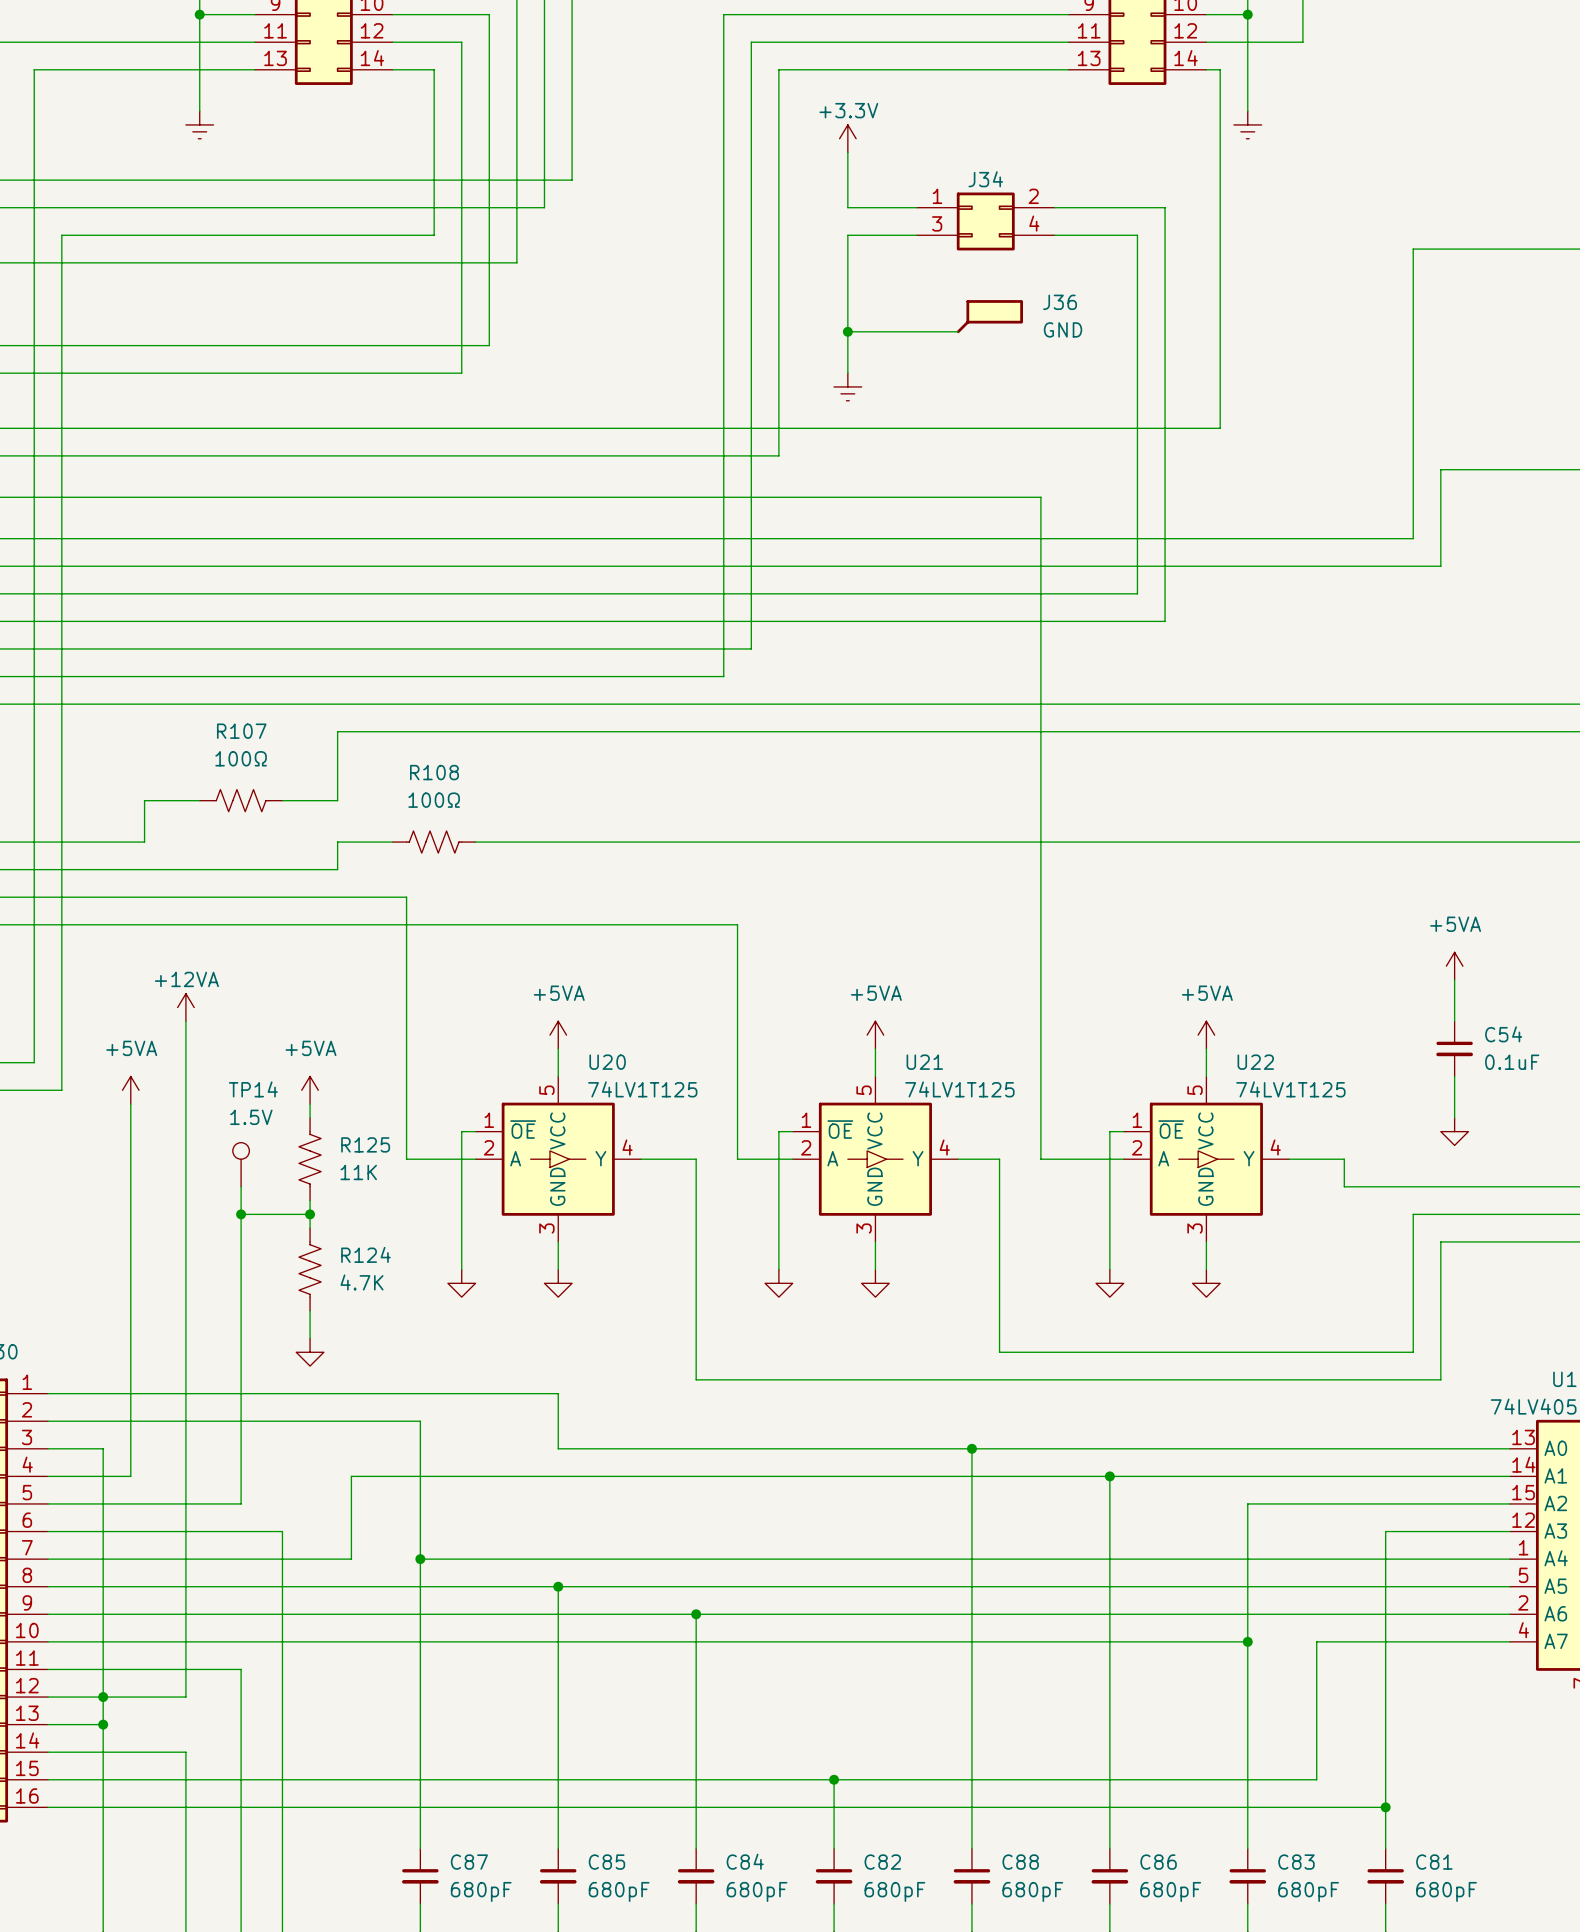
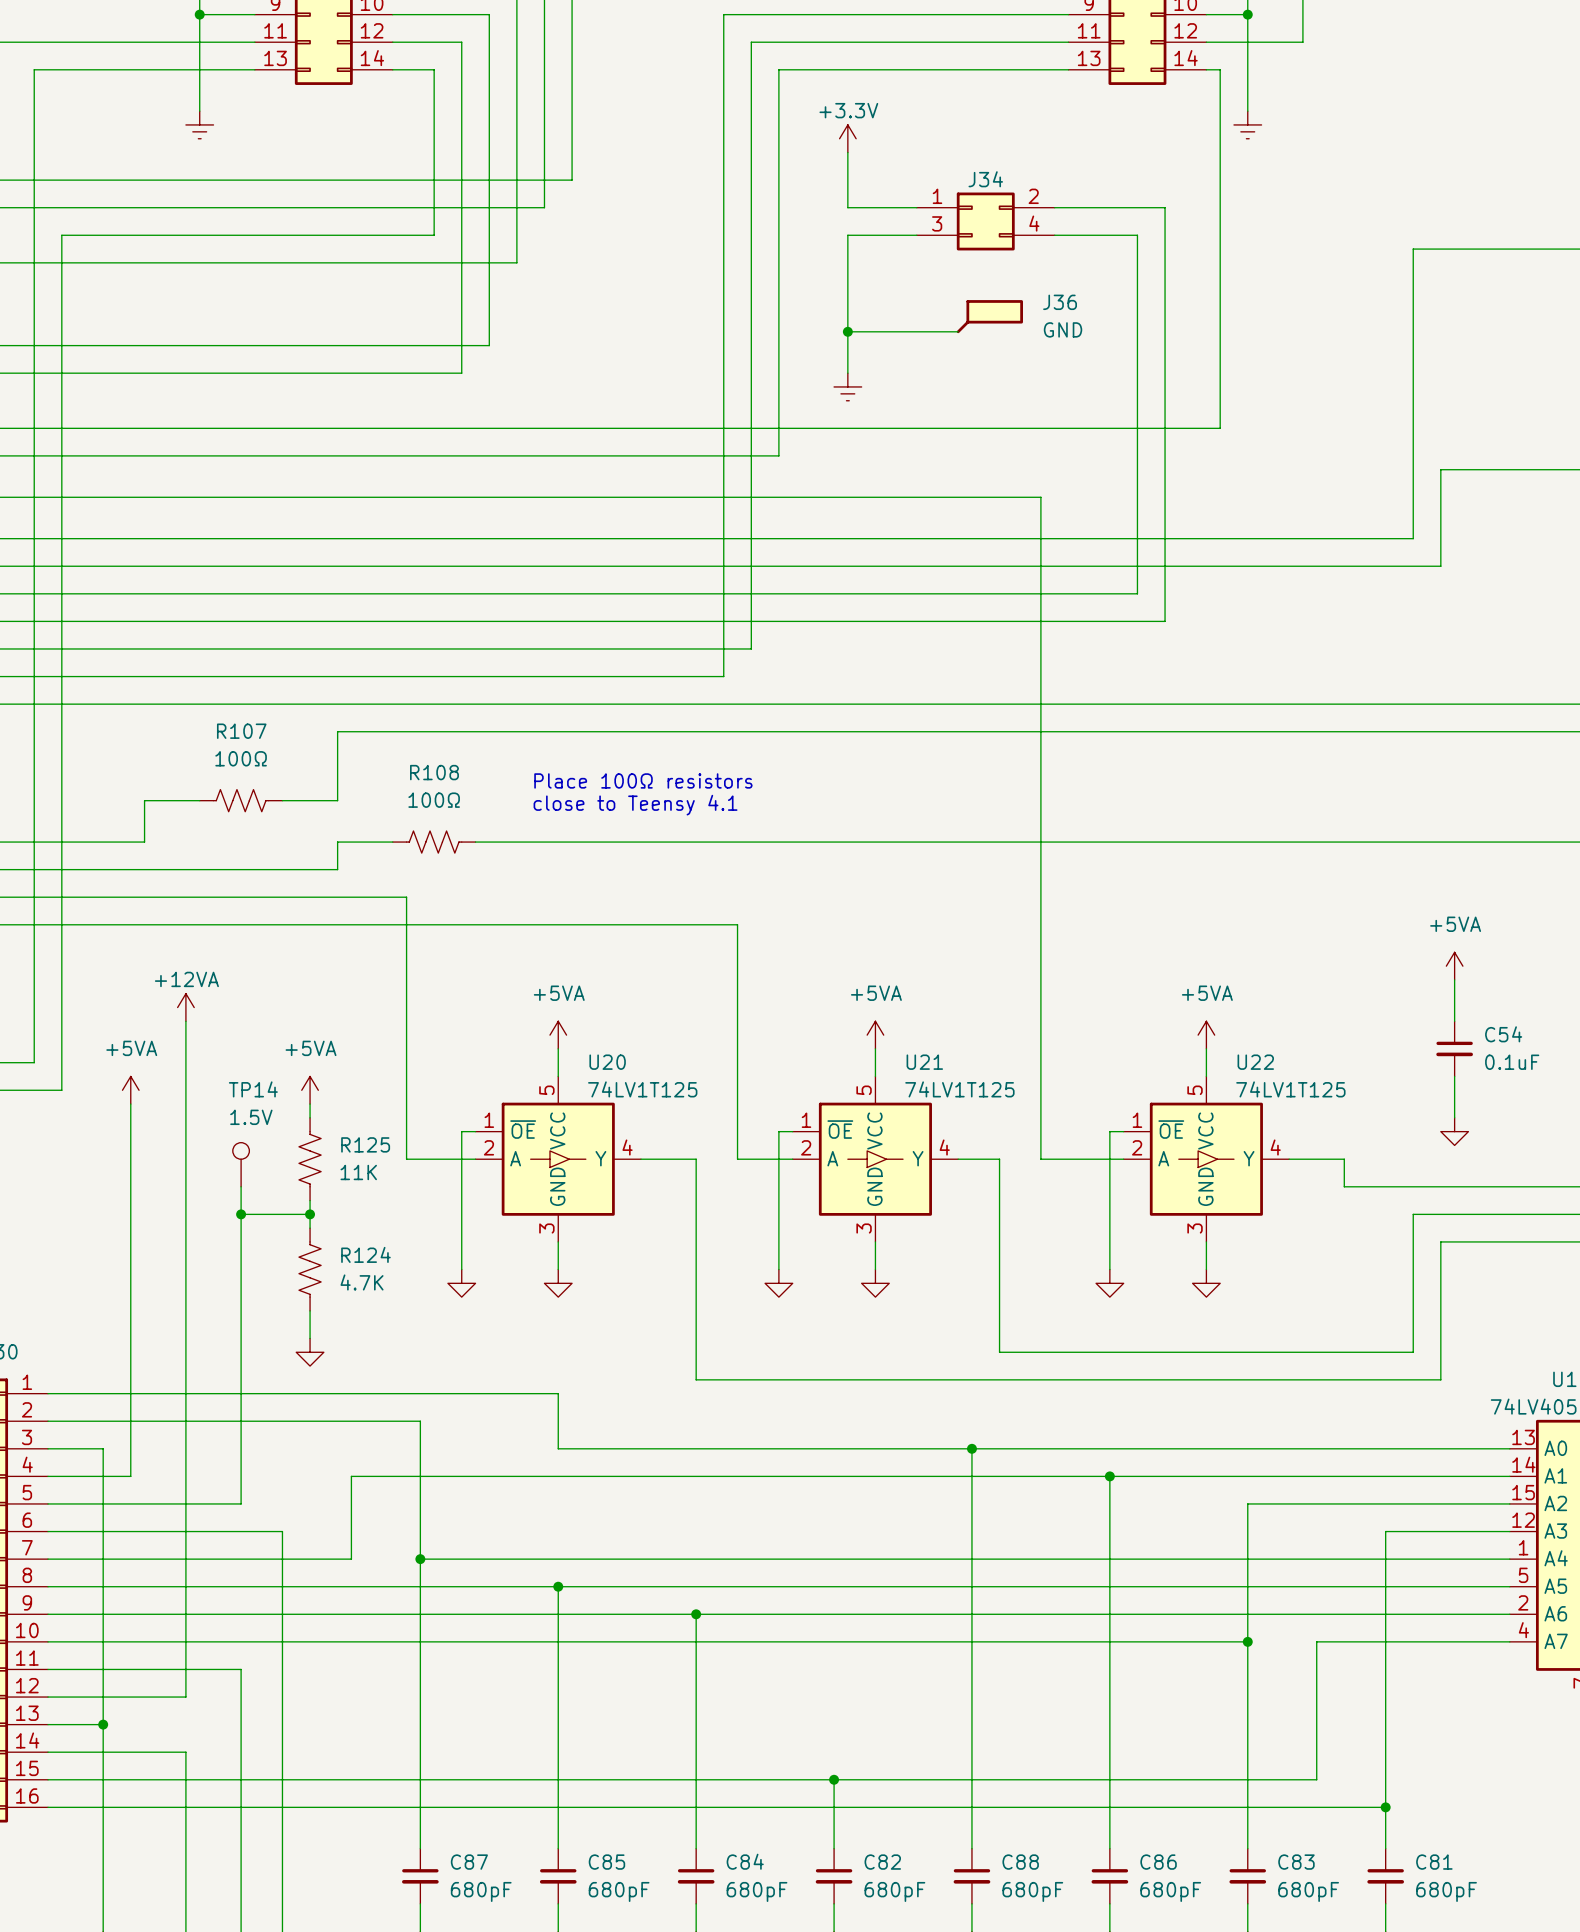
text: none -> Place 100Ω resistors (643, 780)
text: none -> close to Teensy 4.1 (635, 805)
junction: (103, 1697) -> none

